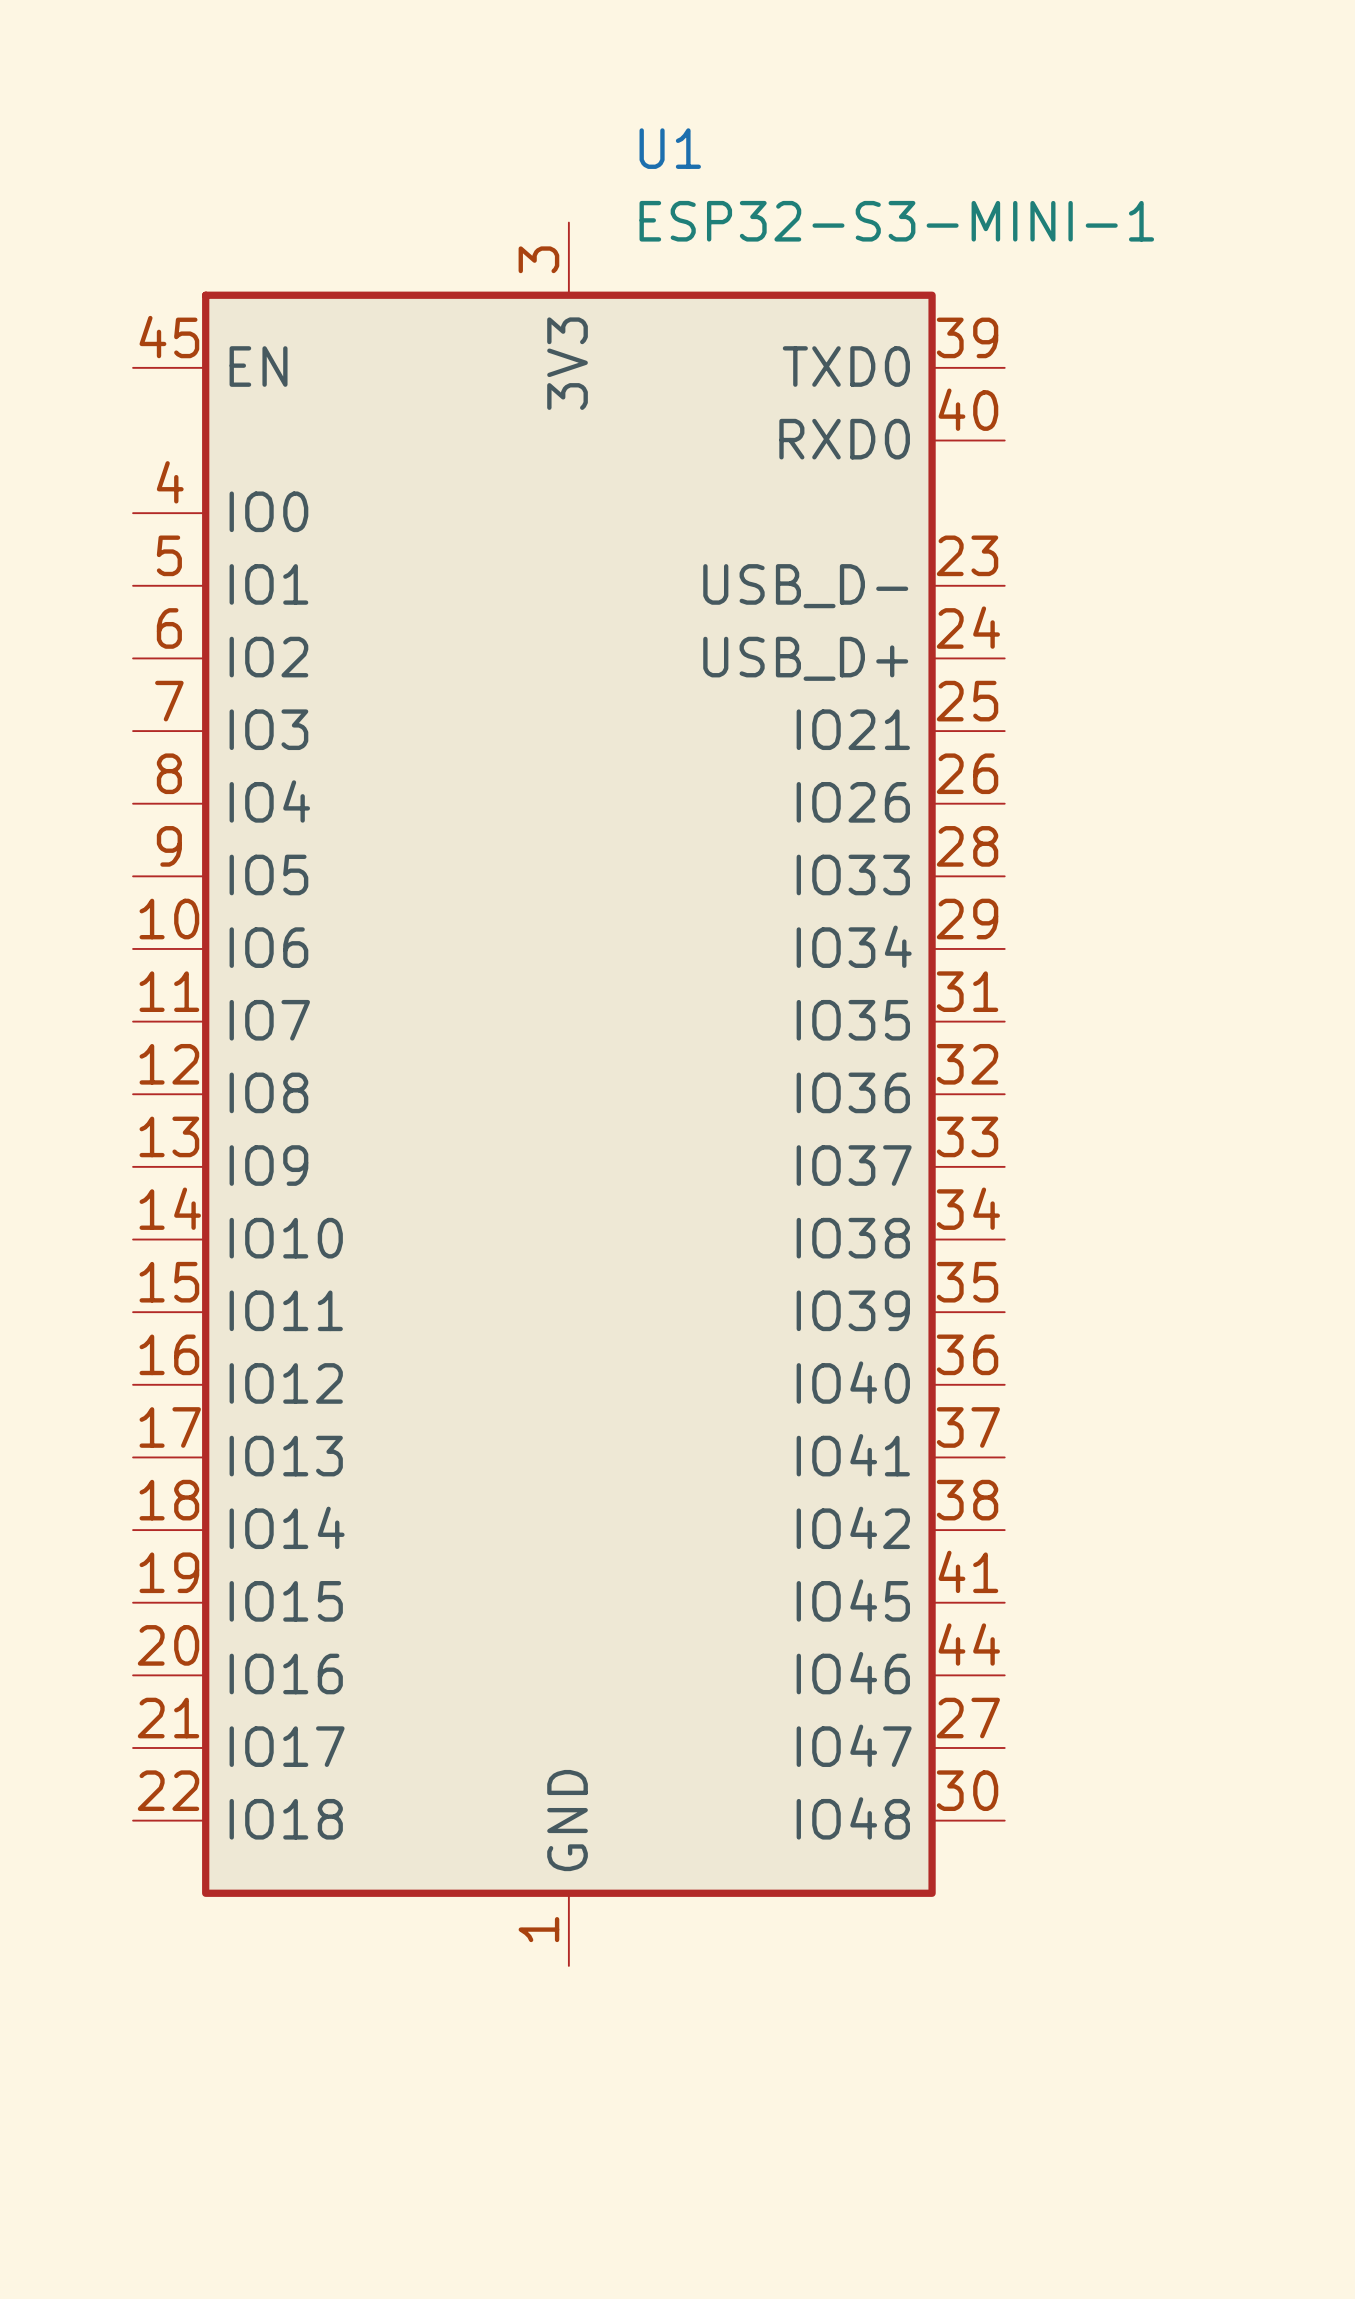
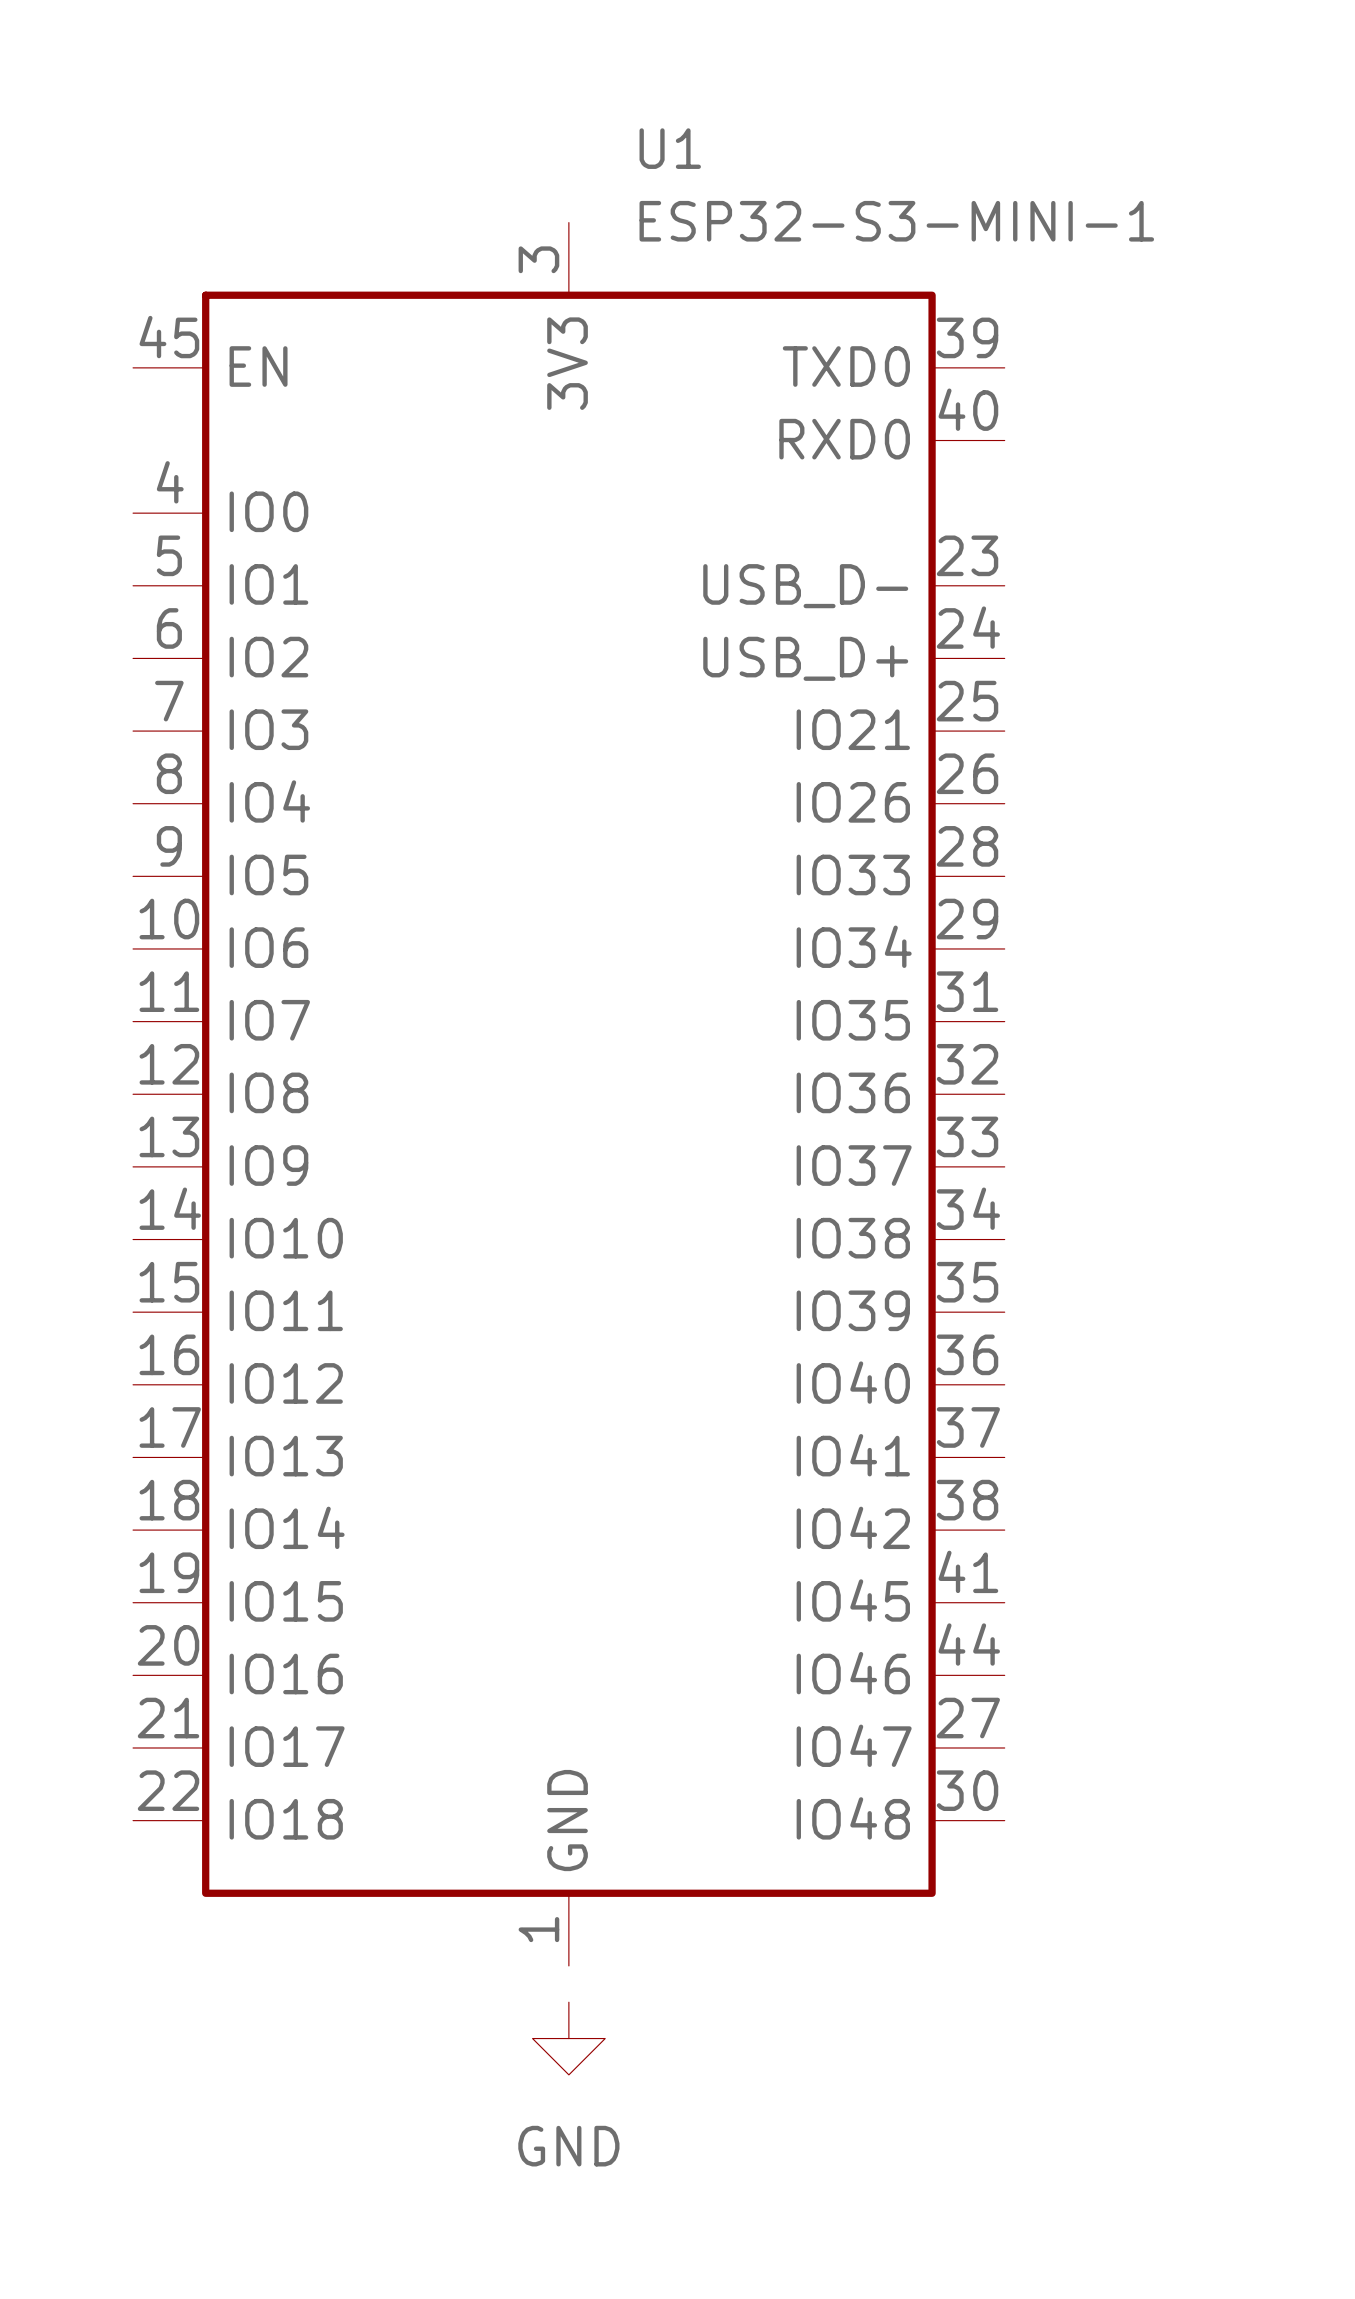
power symbol: none -> GND (568, 2038)

